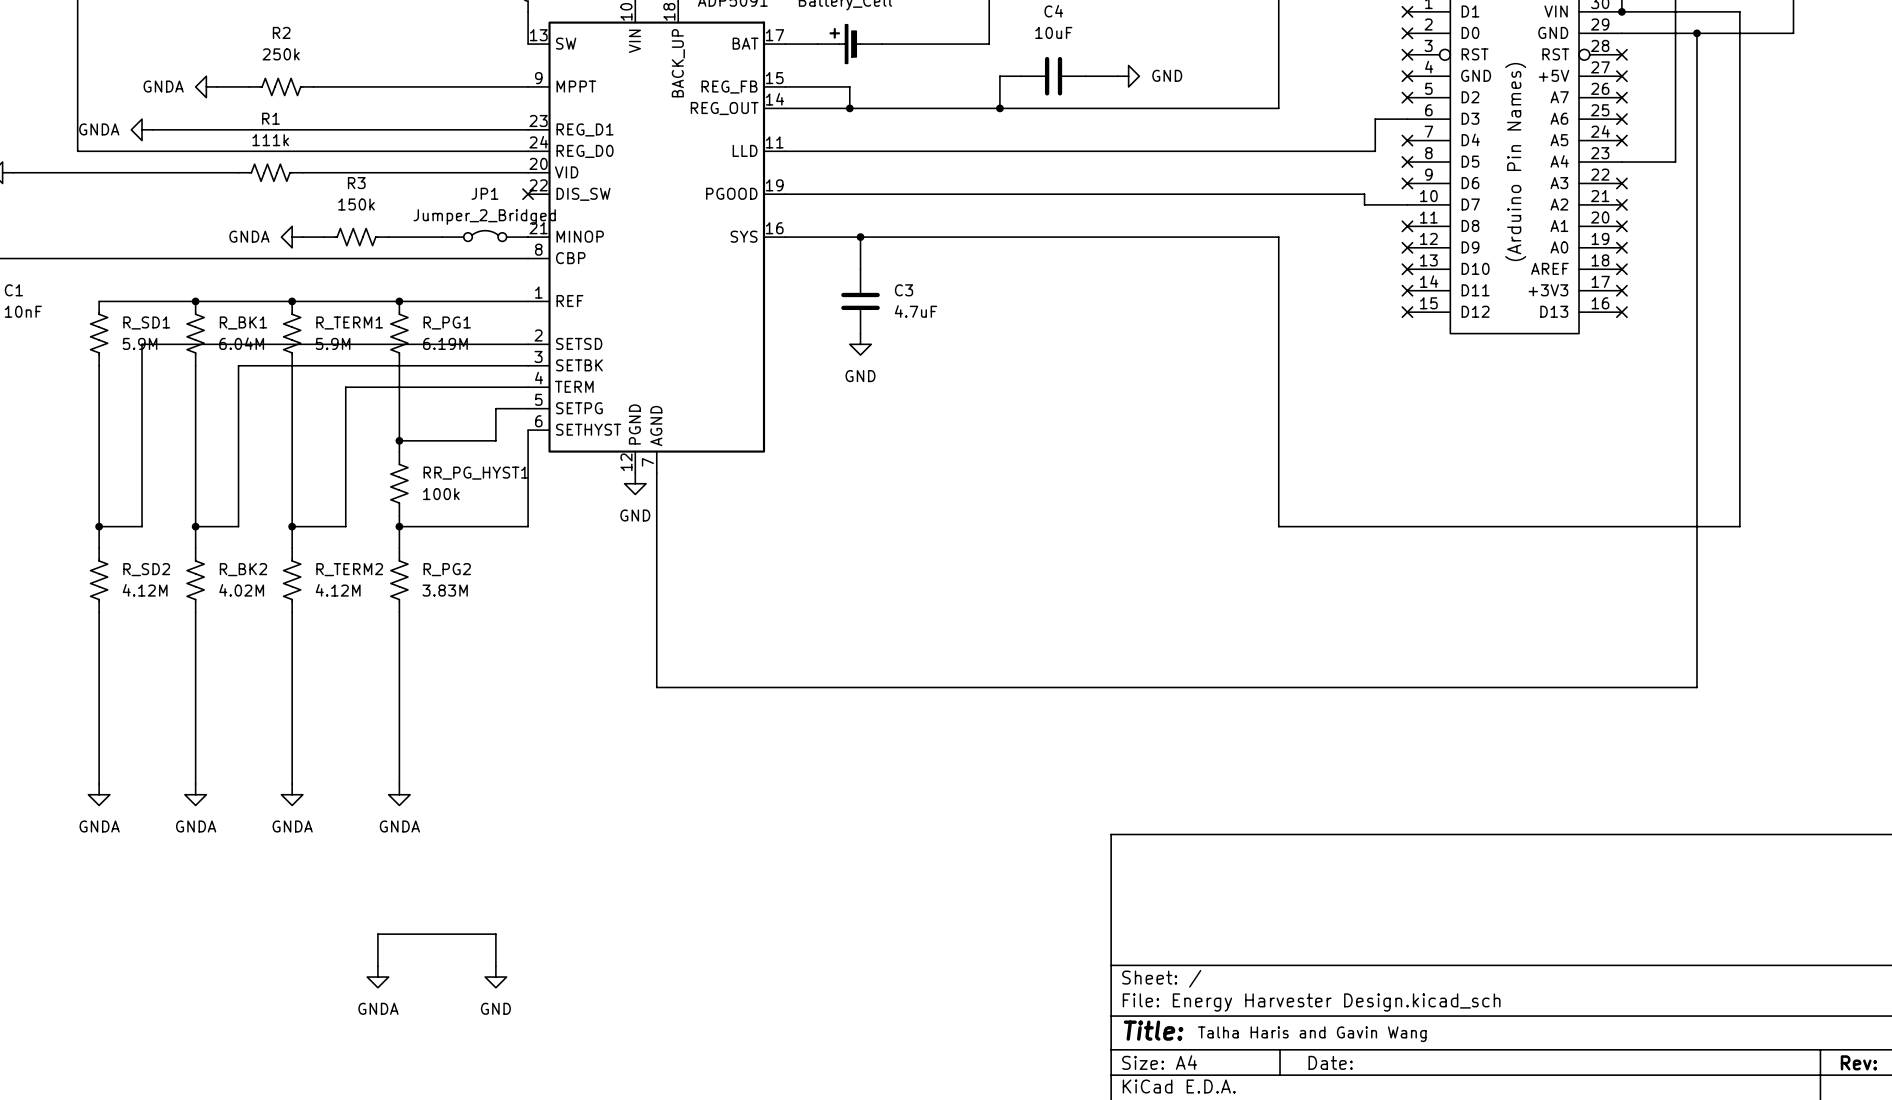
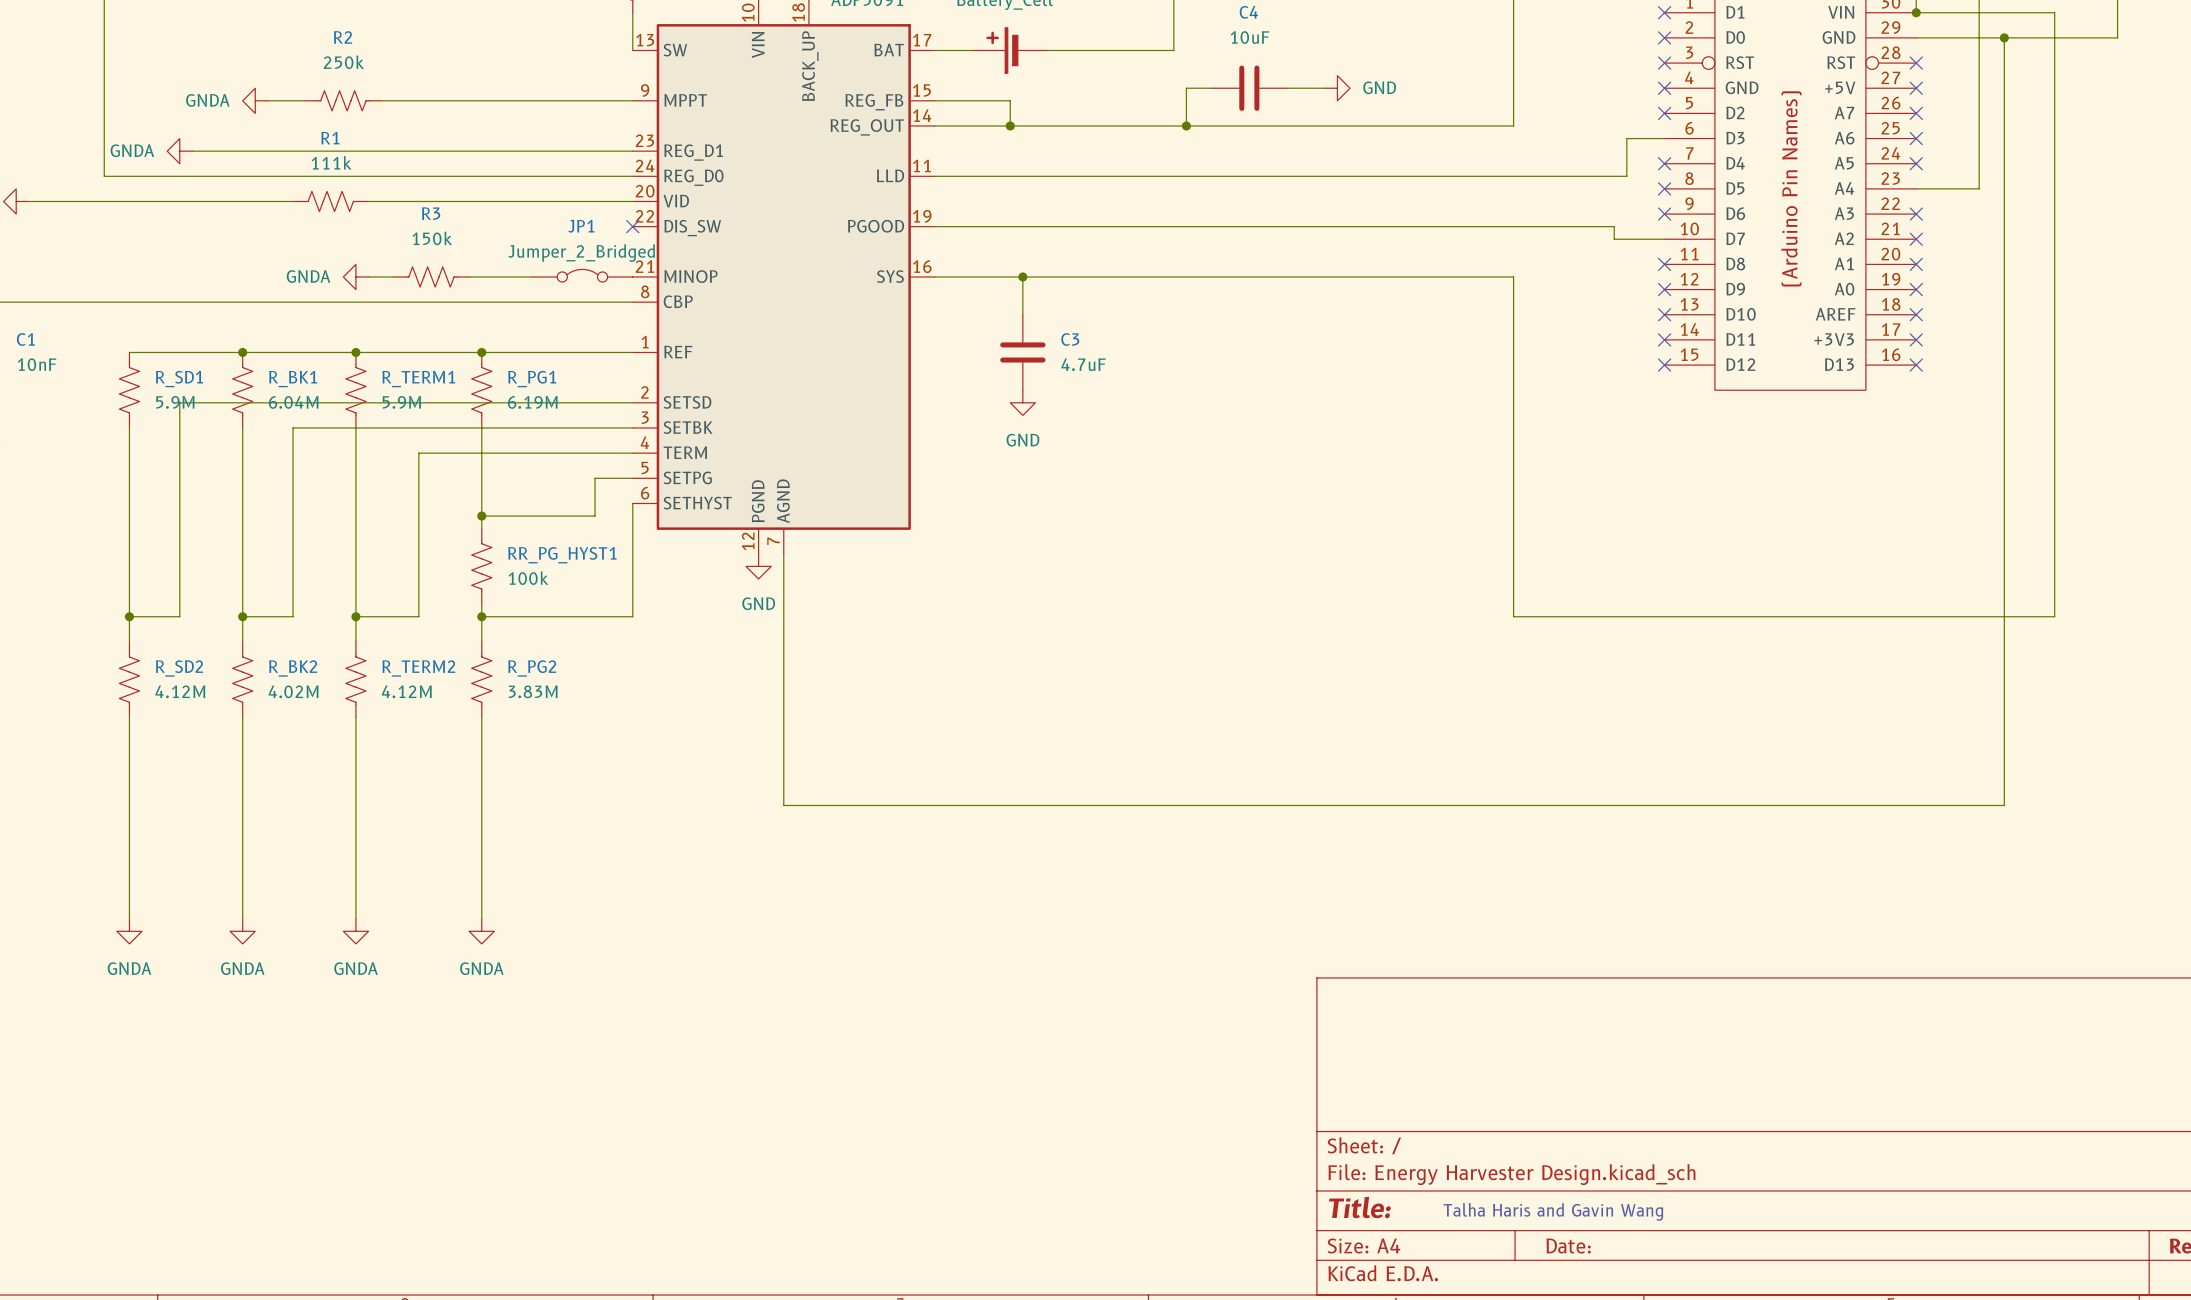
wire: (377, 966) (377, 934) (495, 934) (495, 966) -> none
power symbol: GNDA (377, 977) -> none
power symbol: GND (495, 977) -> none

